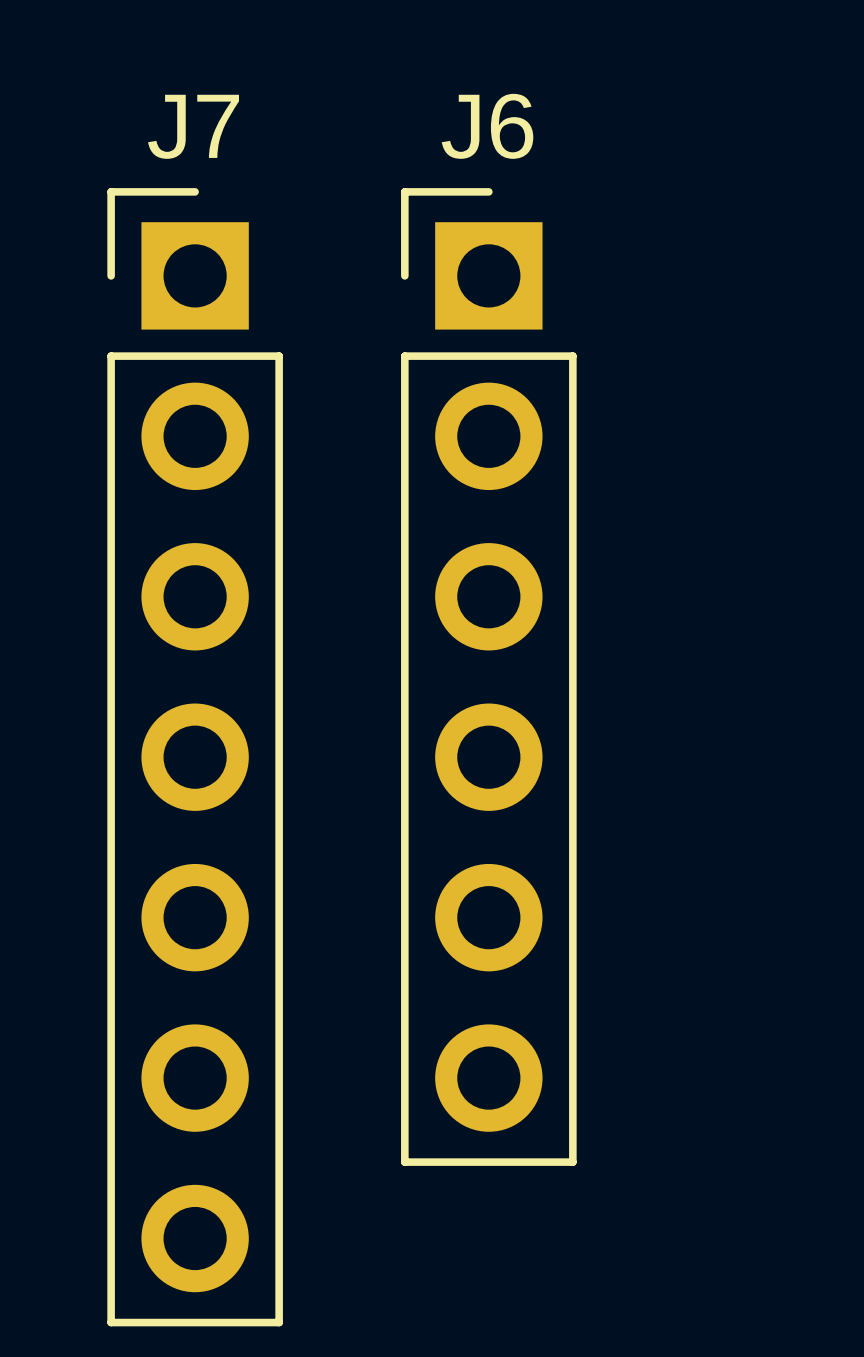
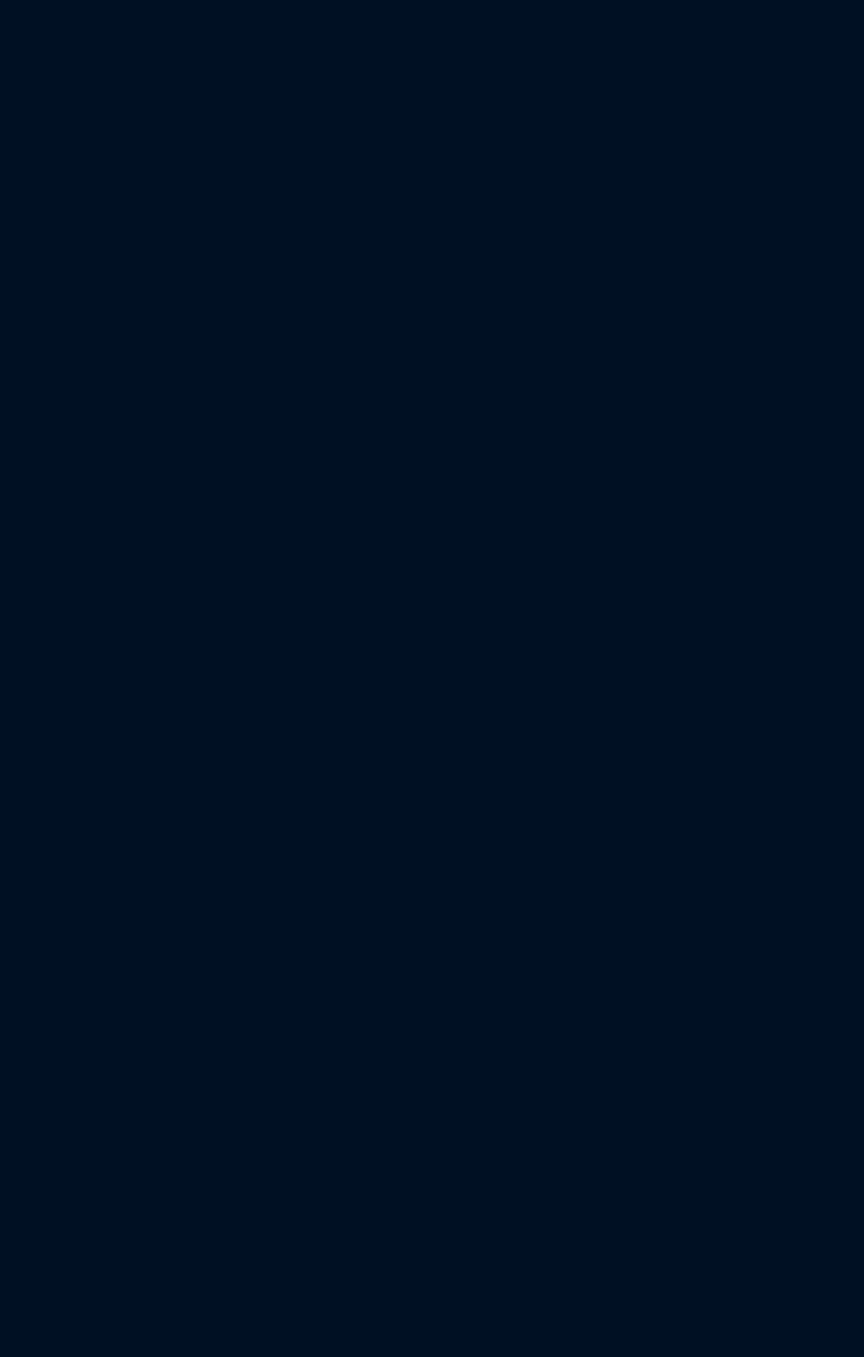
J6: (488, 676) -> none
J7: (195, 757) -> none

